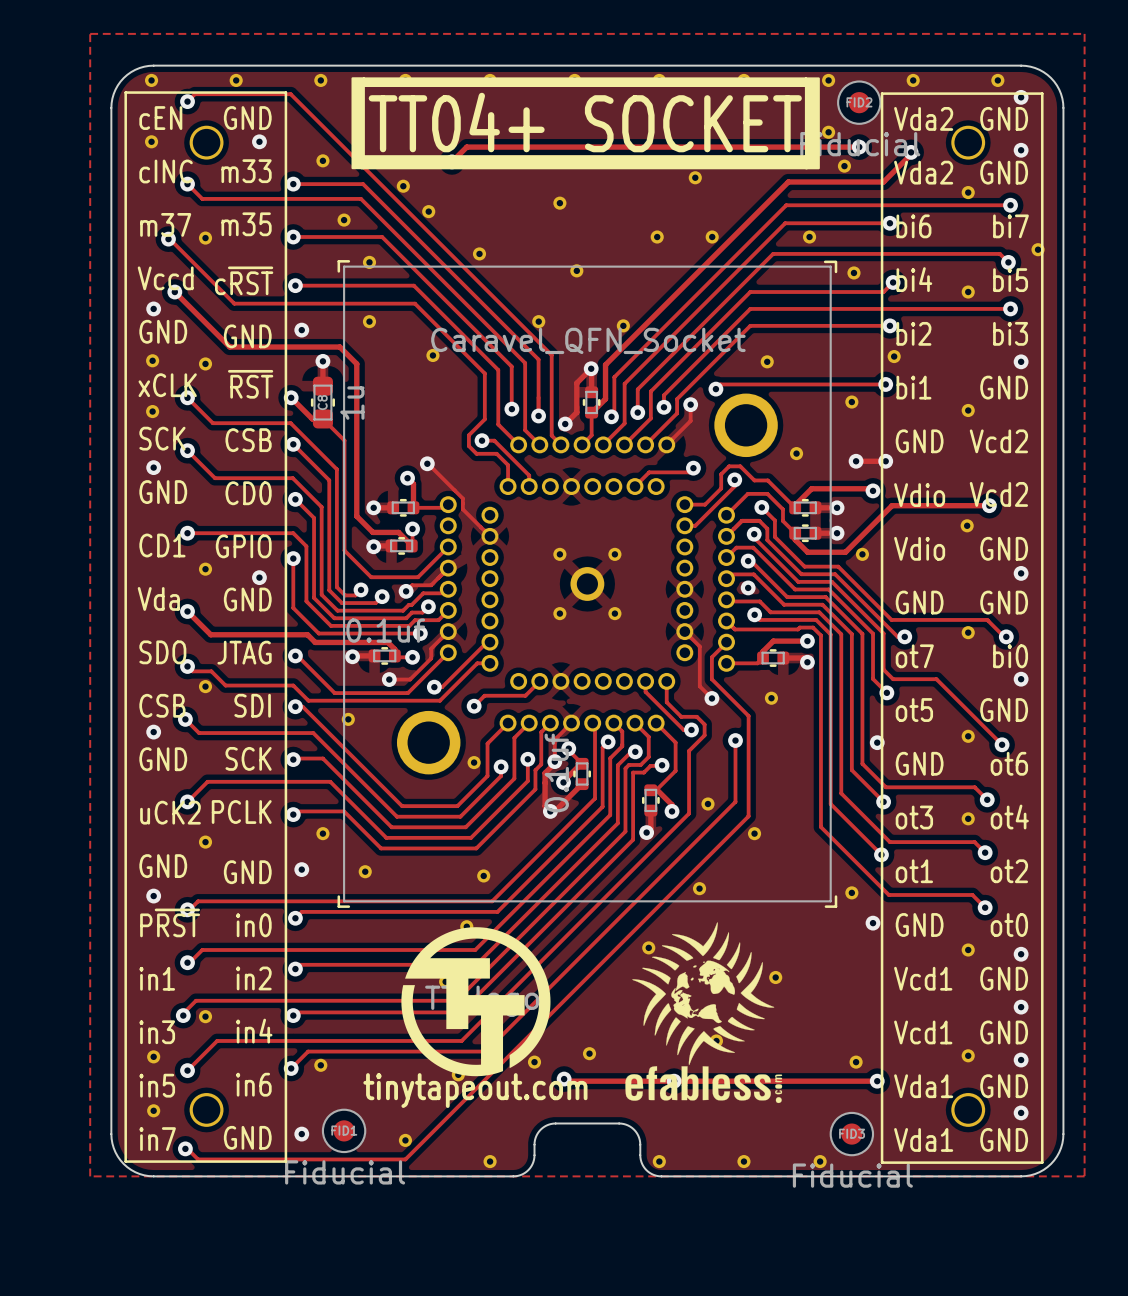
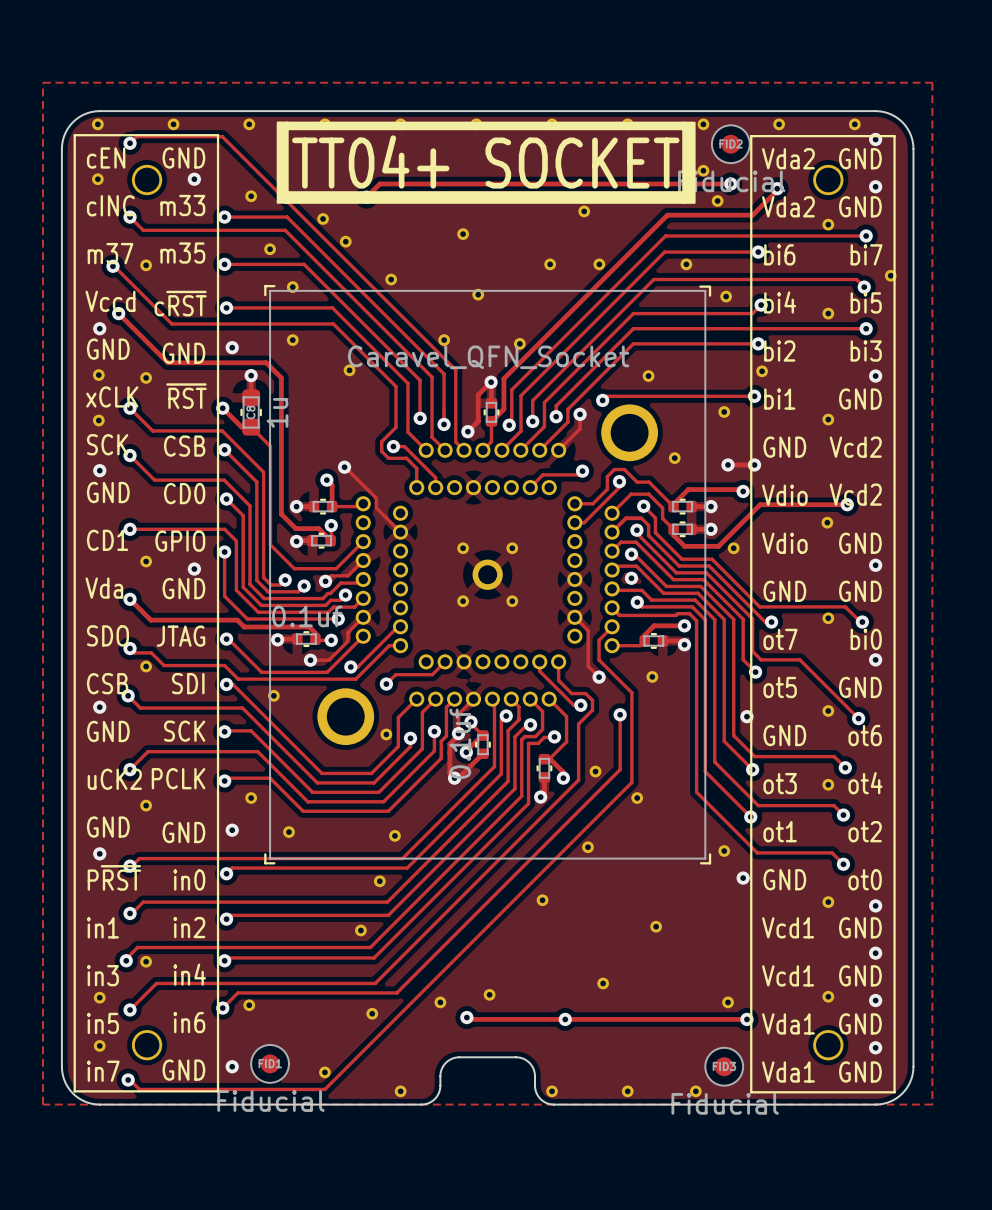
drawing: [625, 922, 783, 1104] -> none
drawing: [401, 927, 551, 1077] -> none
text: tinytapeout.com (475, 1090) -> none

